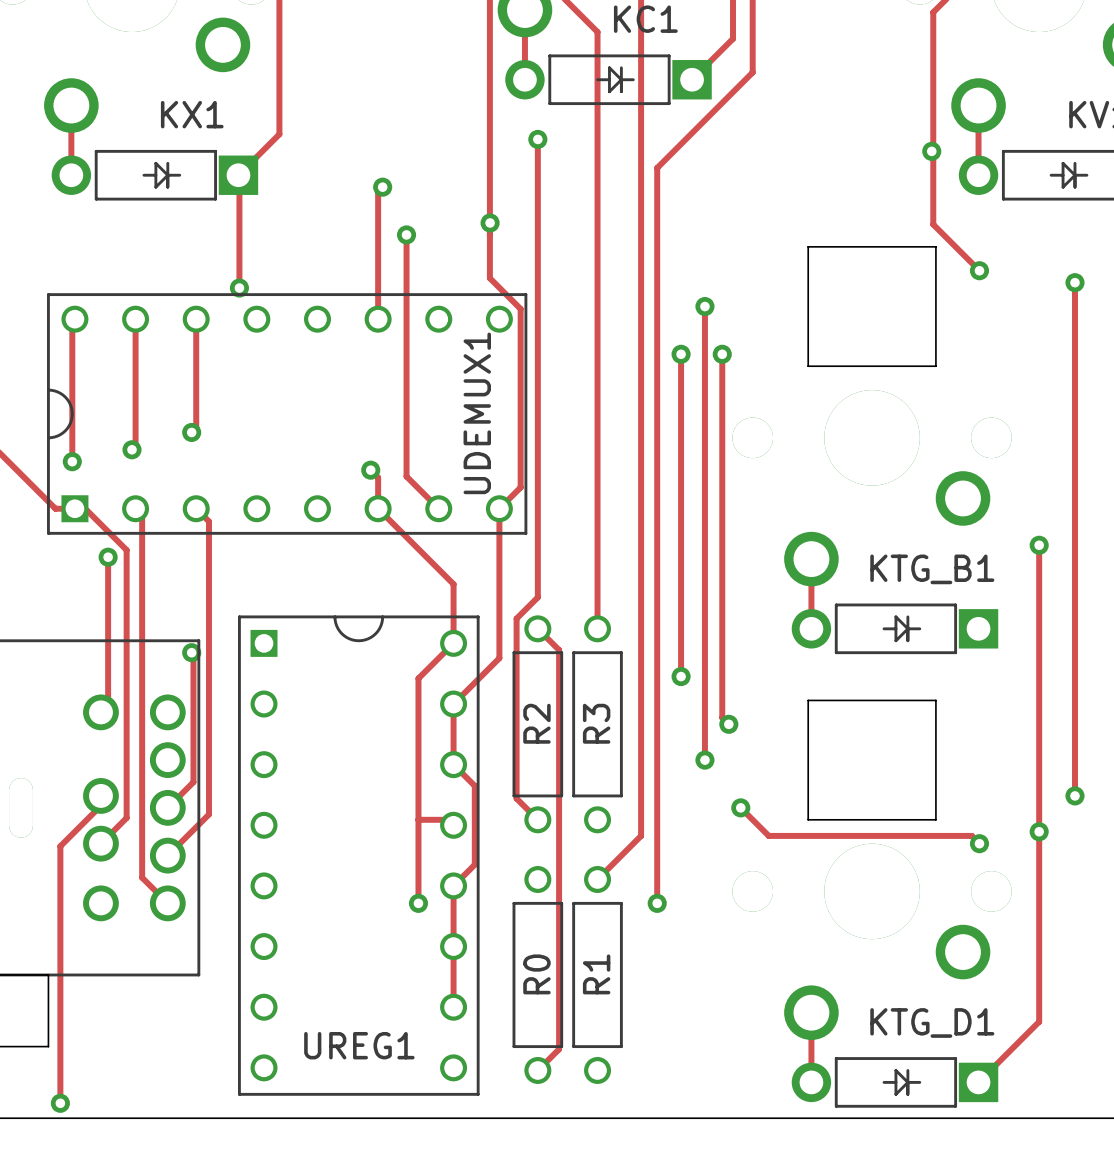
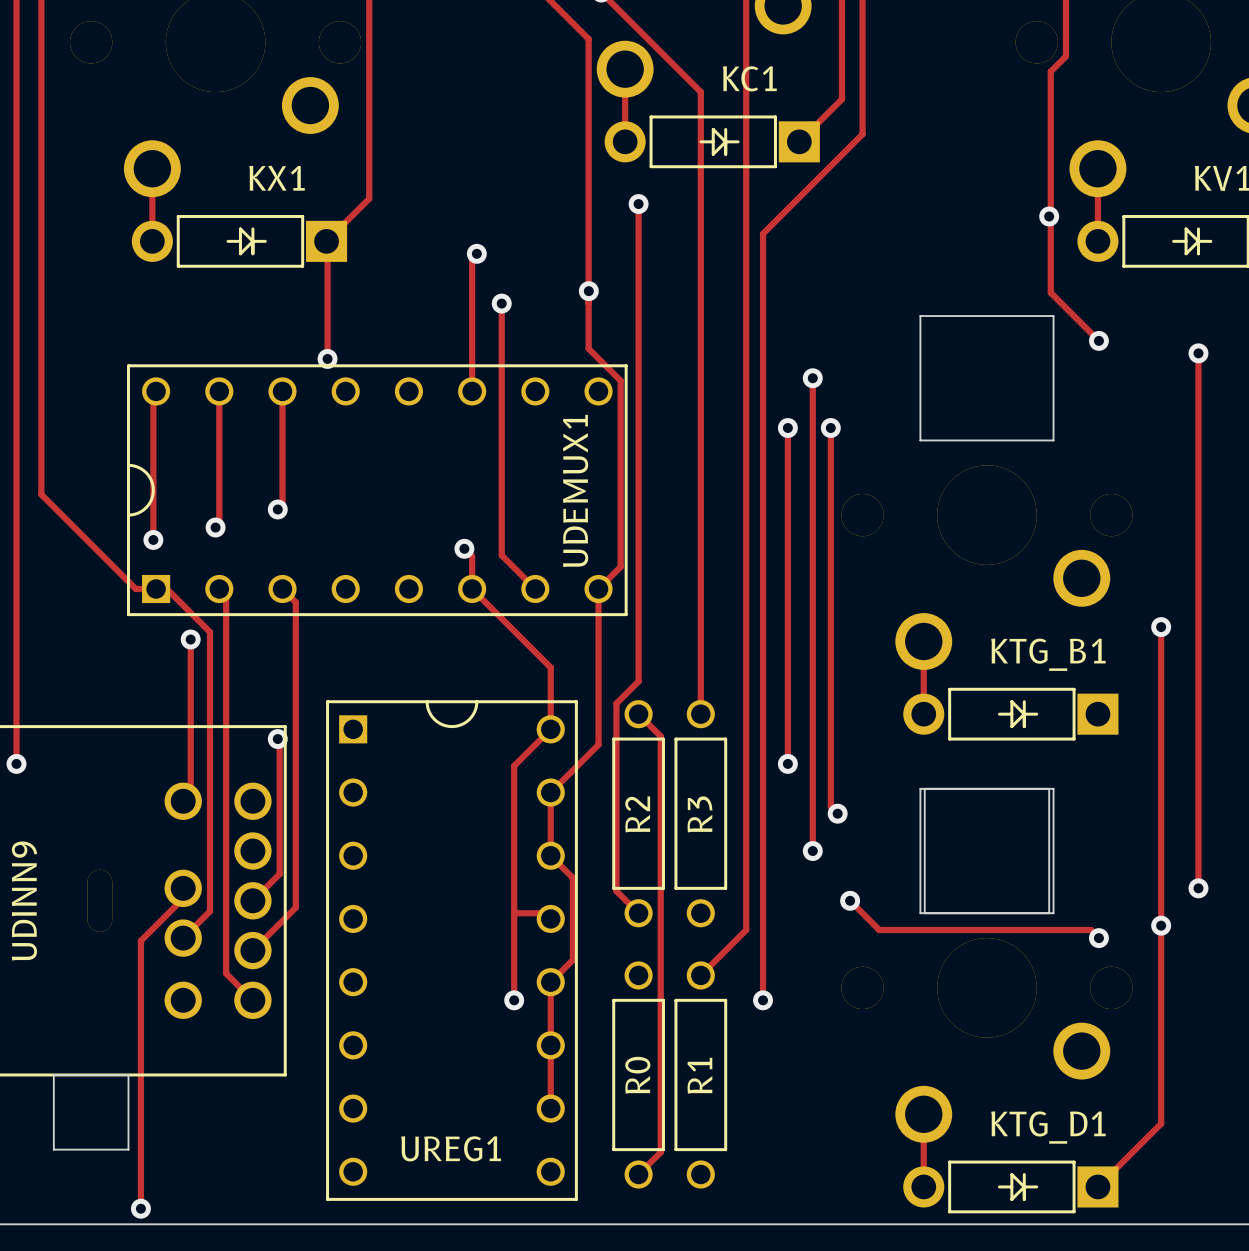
board edge: none -> (924, 788) (1049, 788) (1049, 913) (924, 913) (924, 788)

